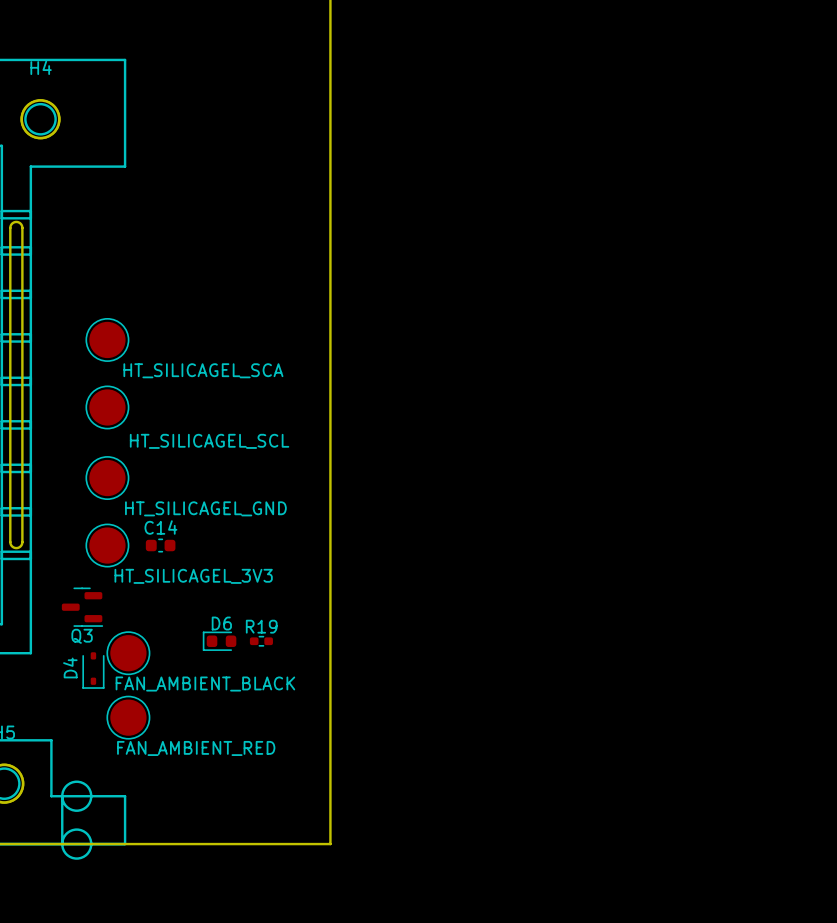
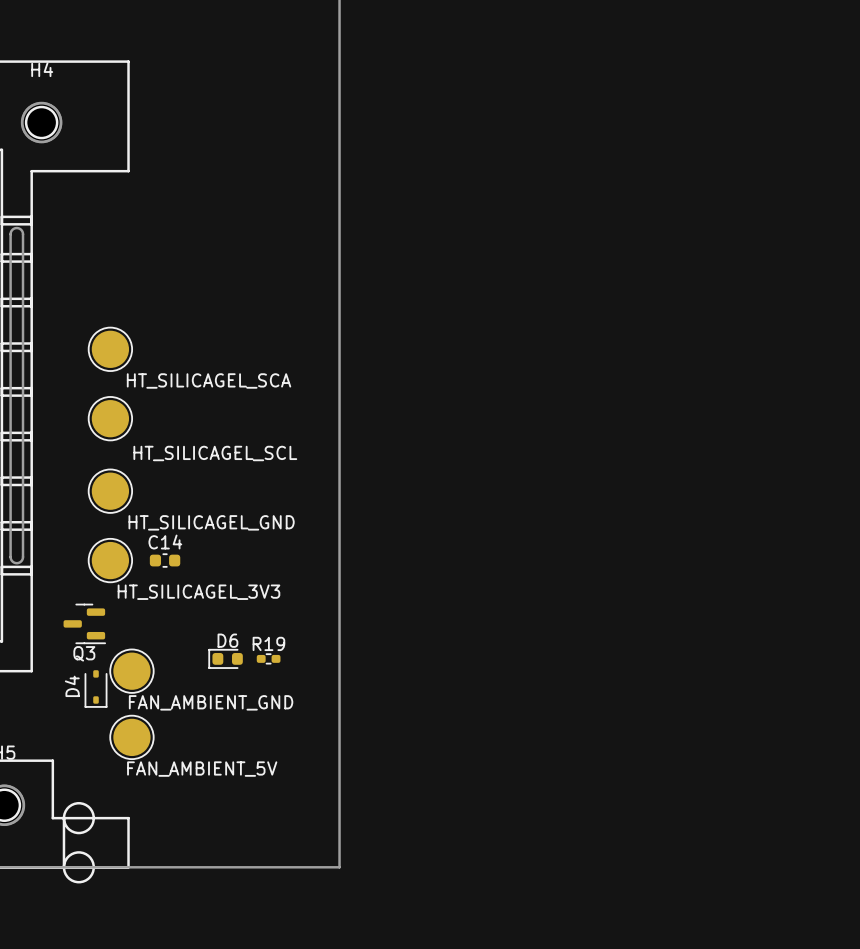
part value: FAN_AMBIENT_BLACK (205, 684) -> FAN_AMBIENT_GND (211, 702)
part value: FAN_AMBIENT_RED (196, 748) -> FAN_AMBIENT_5V (202, 769)

